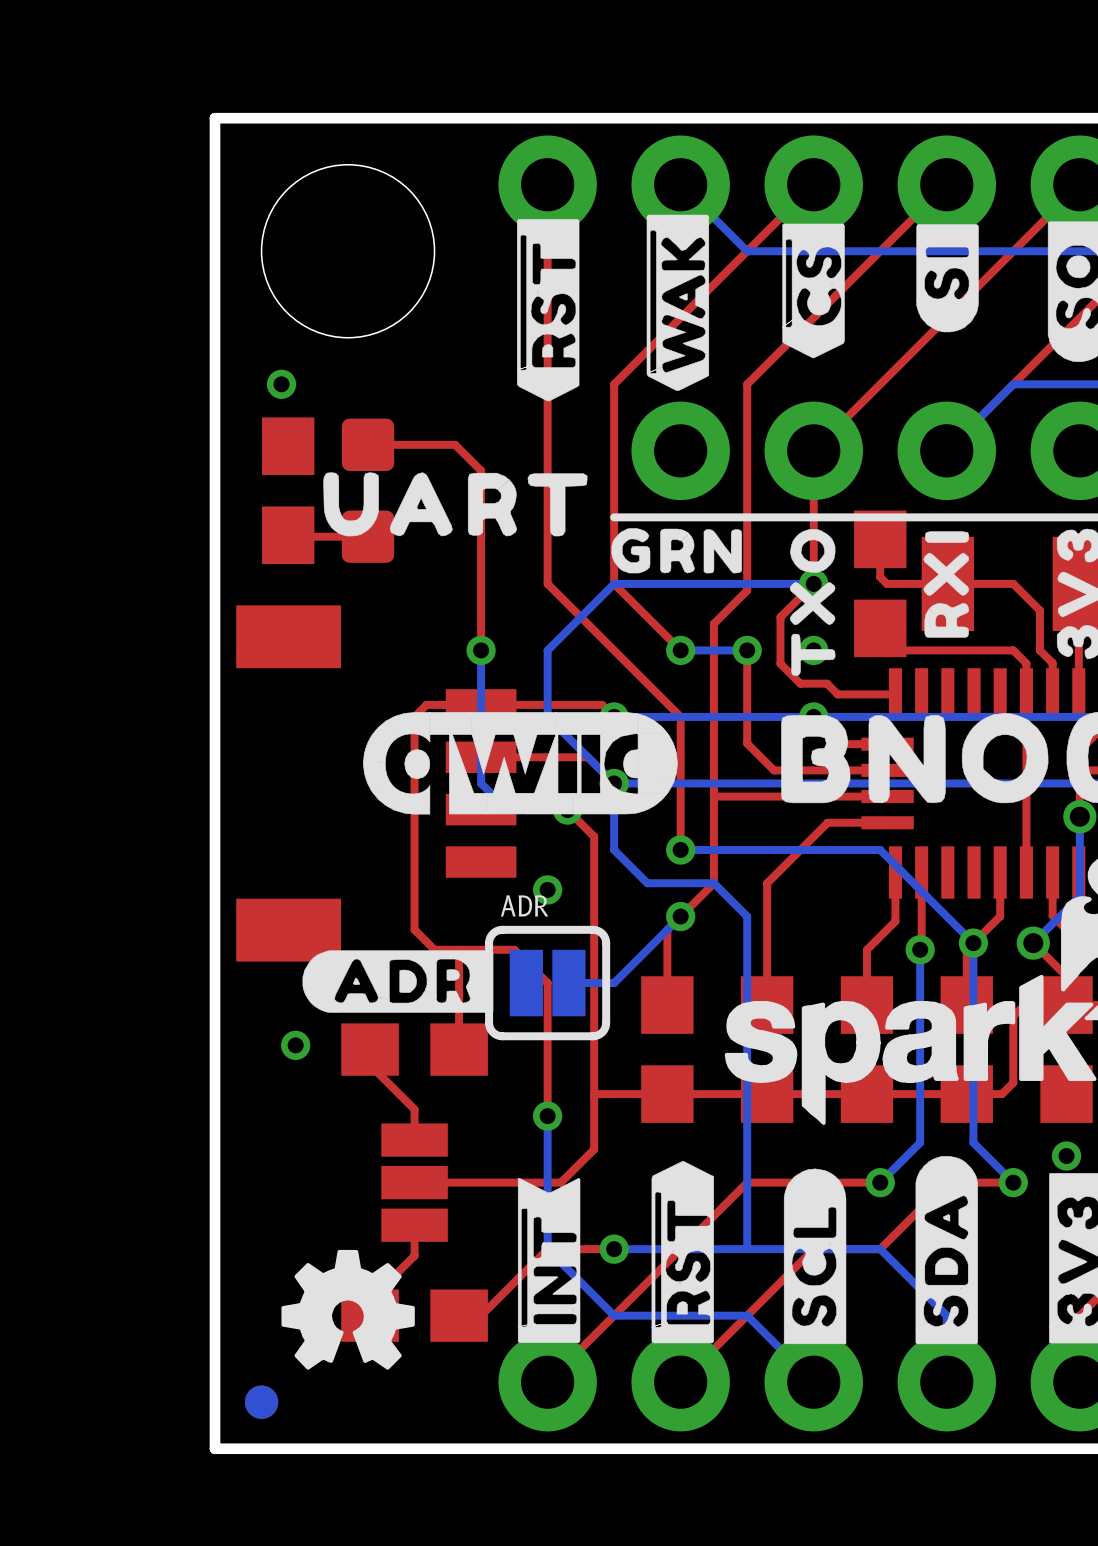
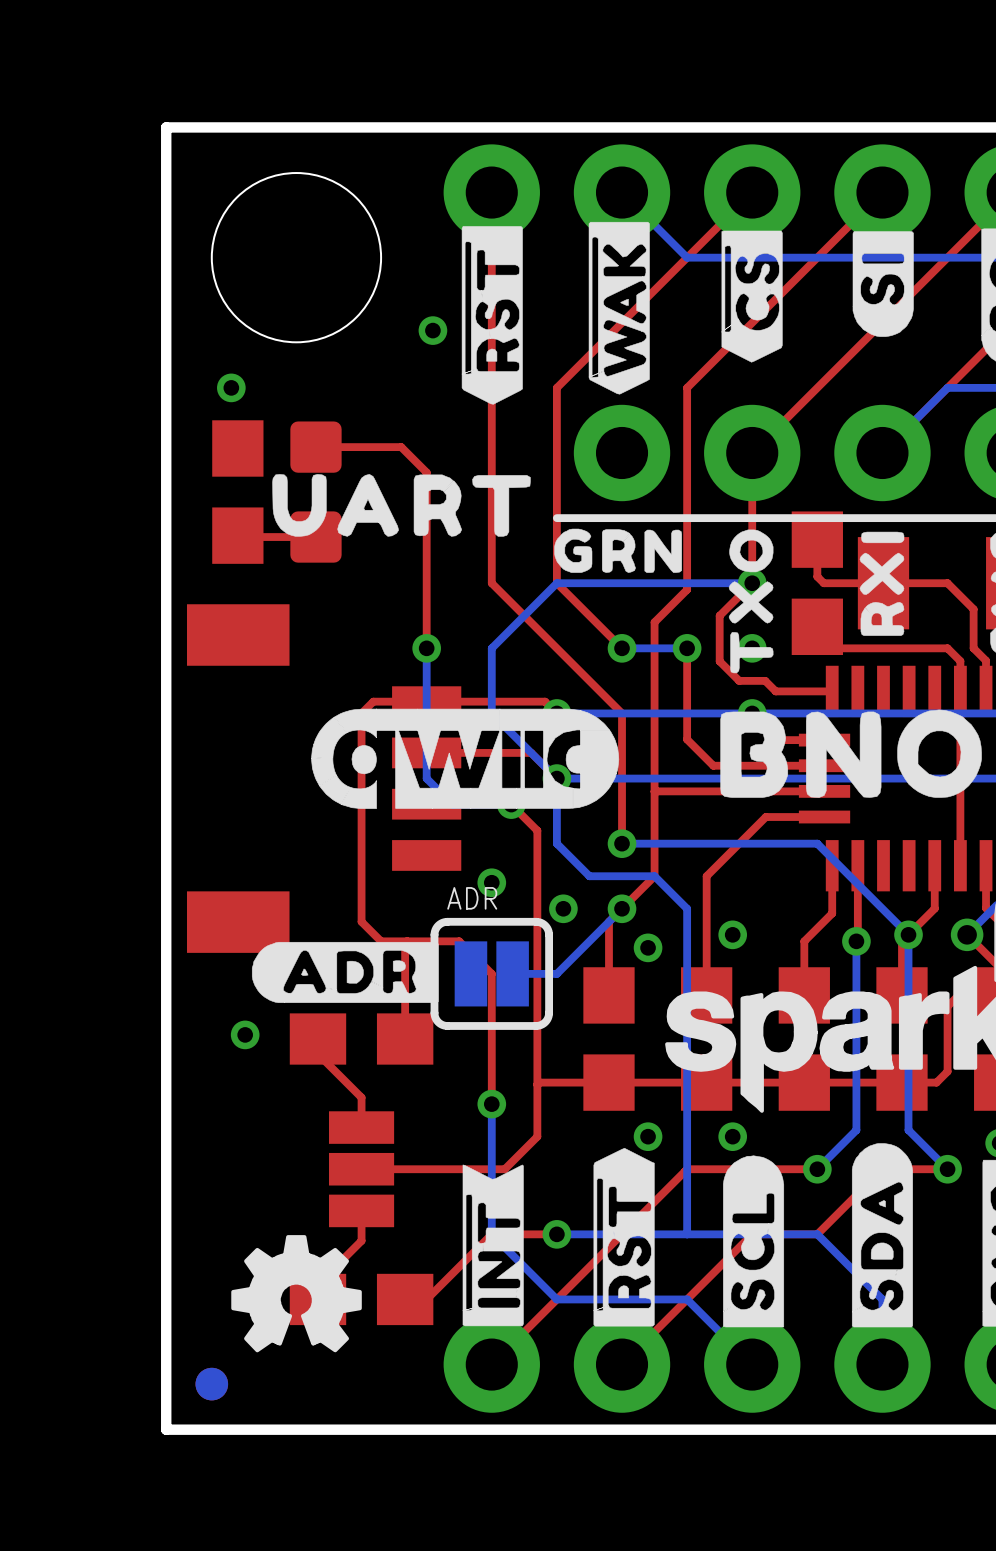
via: none -> (432, 330)
via: none -> (563, 908)
via: none -> (732, 934)
via: none -> (648, 947)
via: none -> (648, 1136)
via: none -> (732, 1136)

